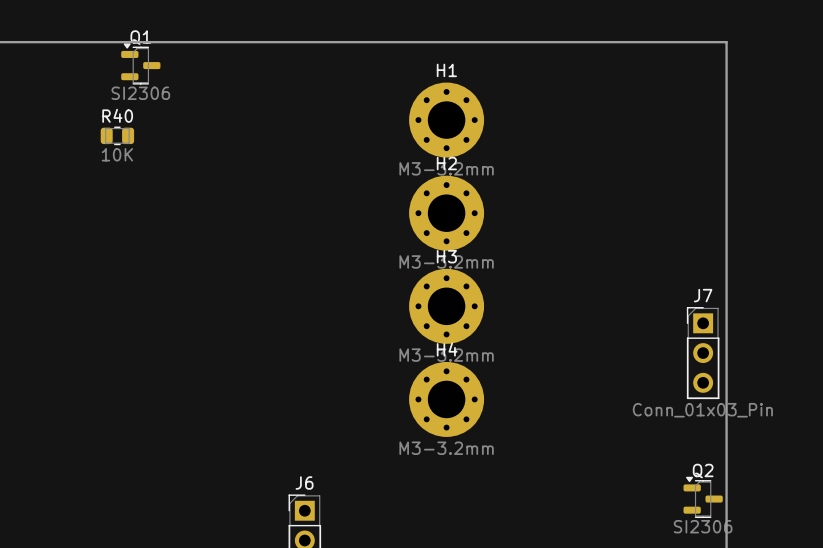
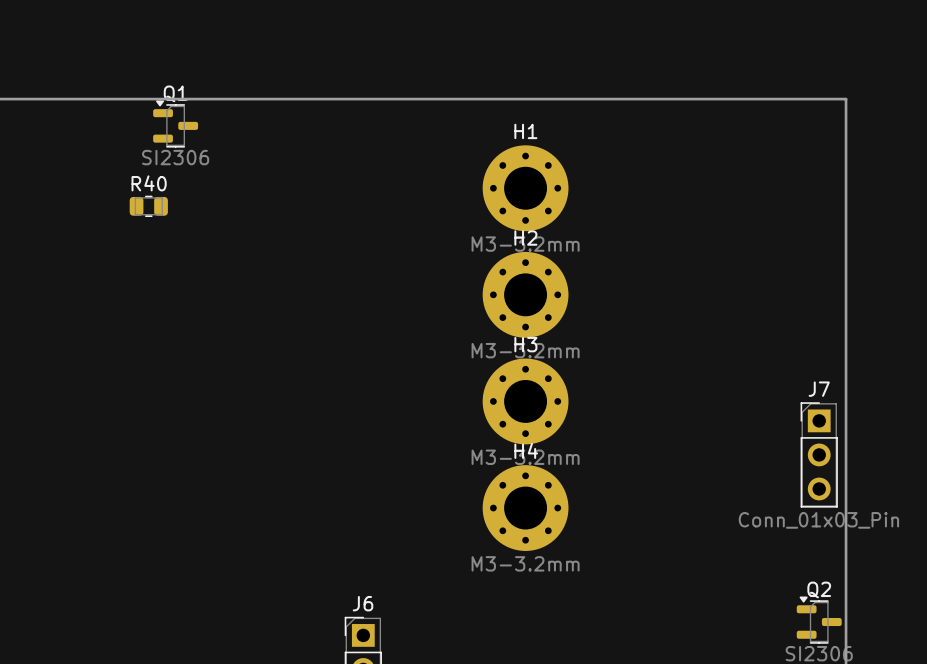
R40 value: 10K (117, 154) -> none

